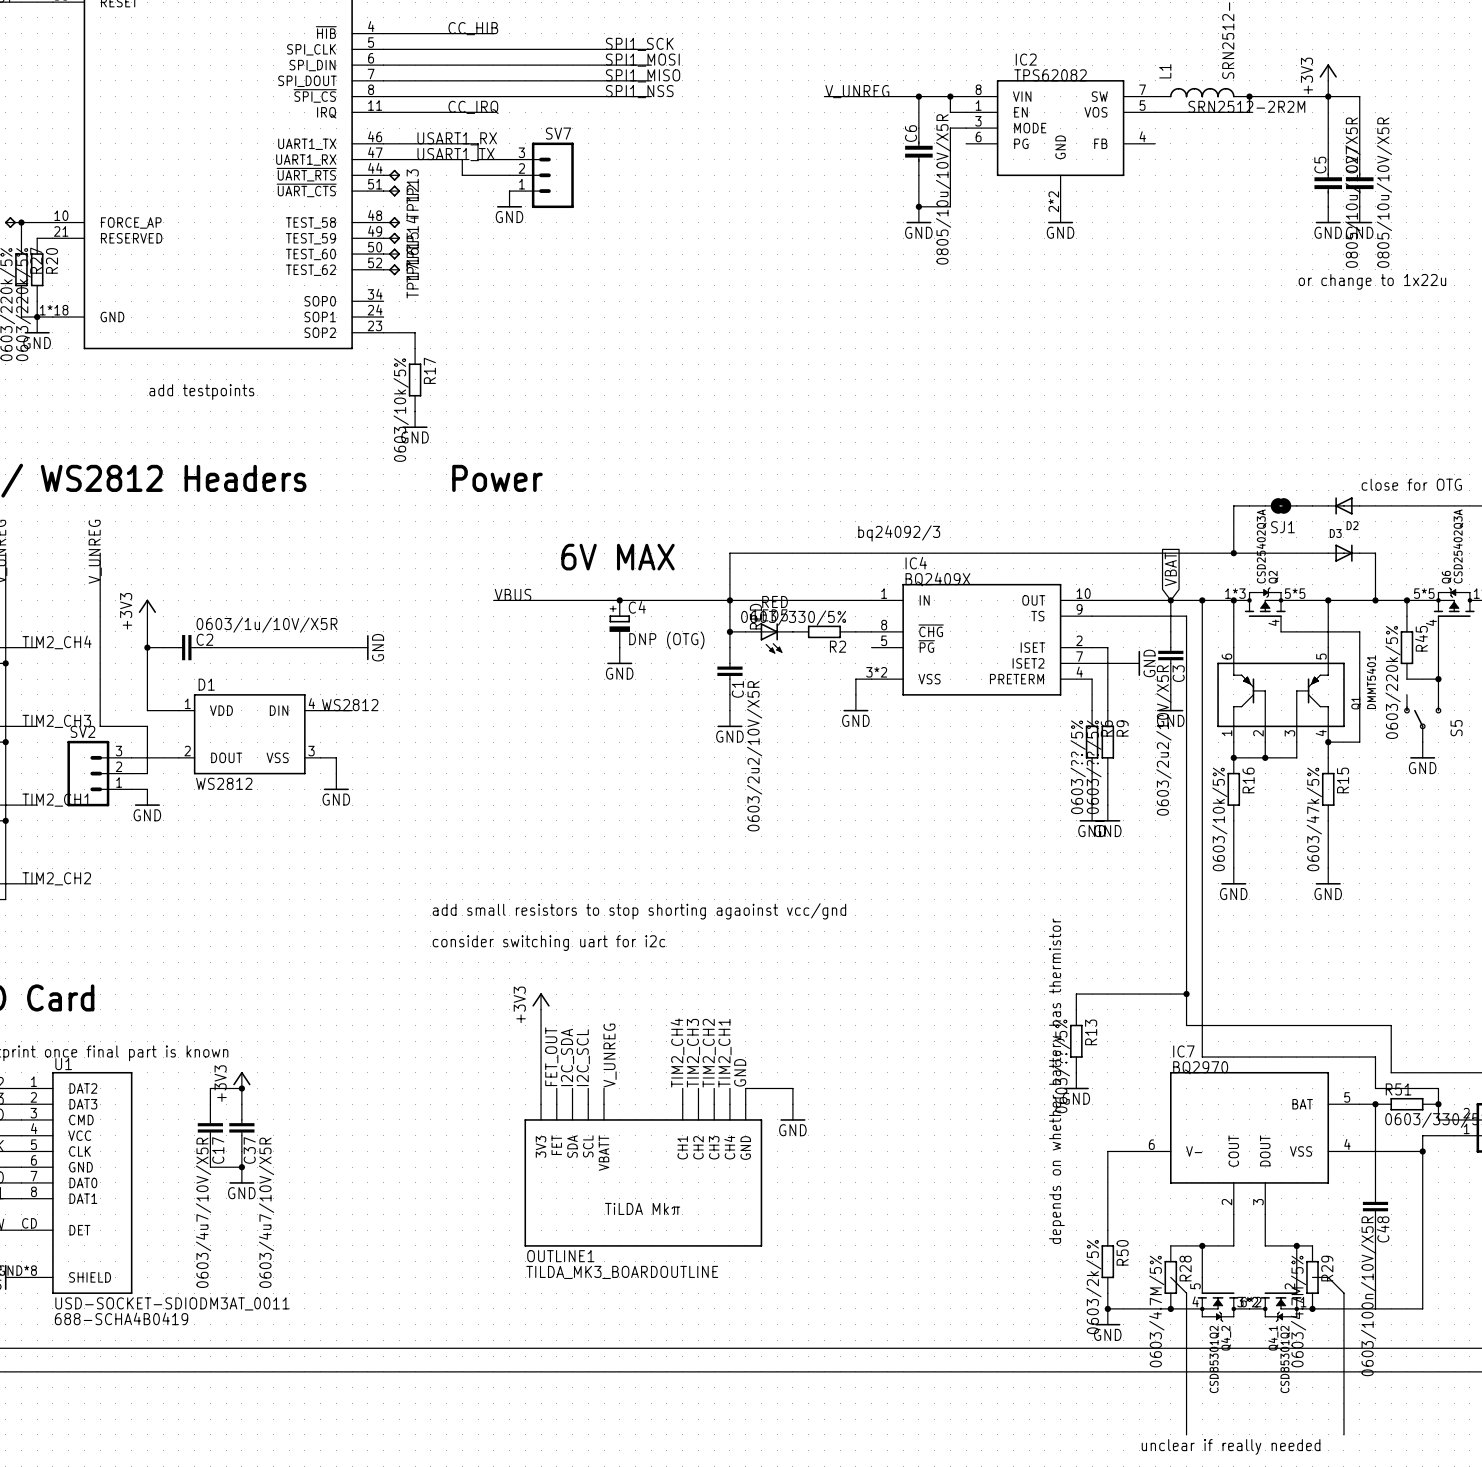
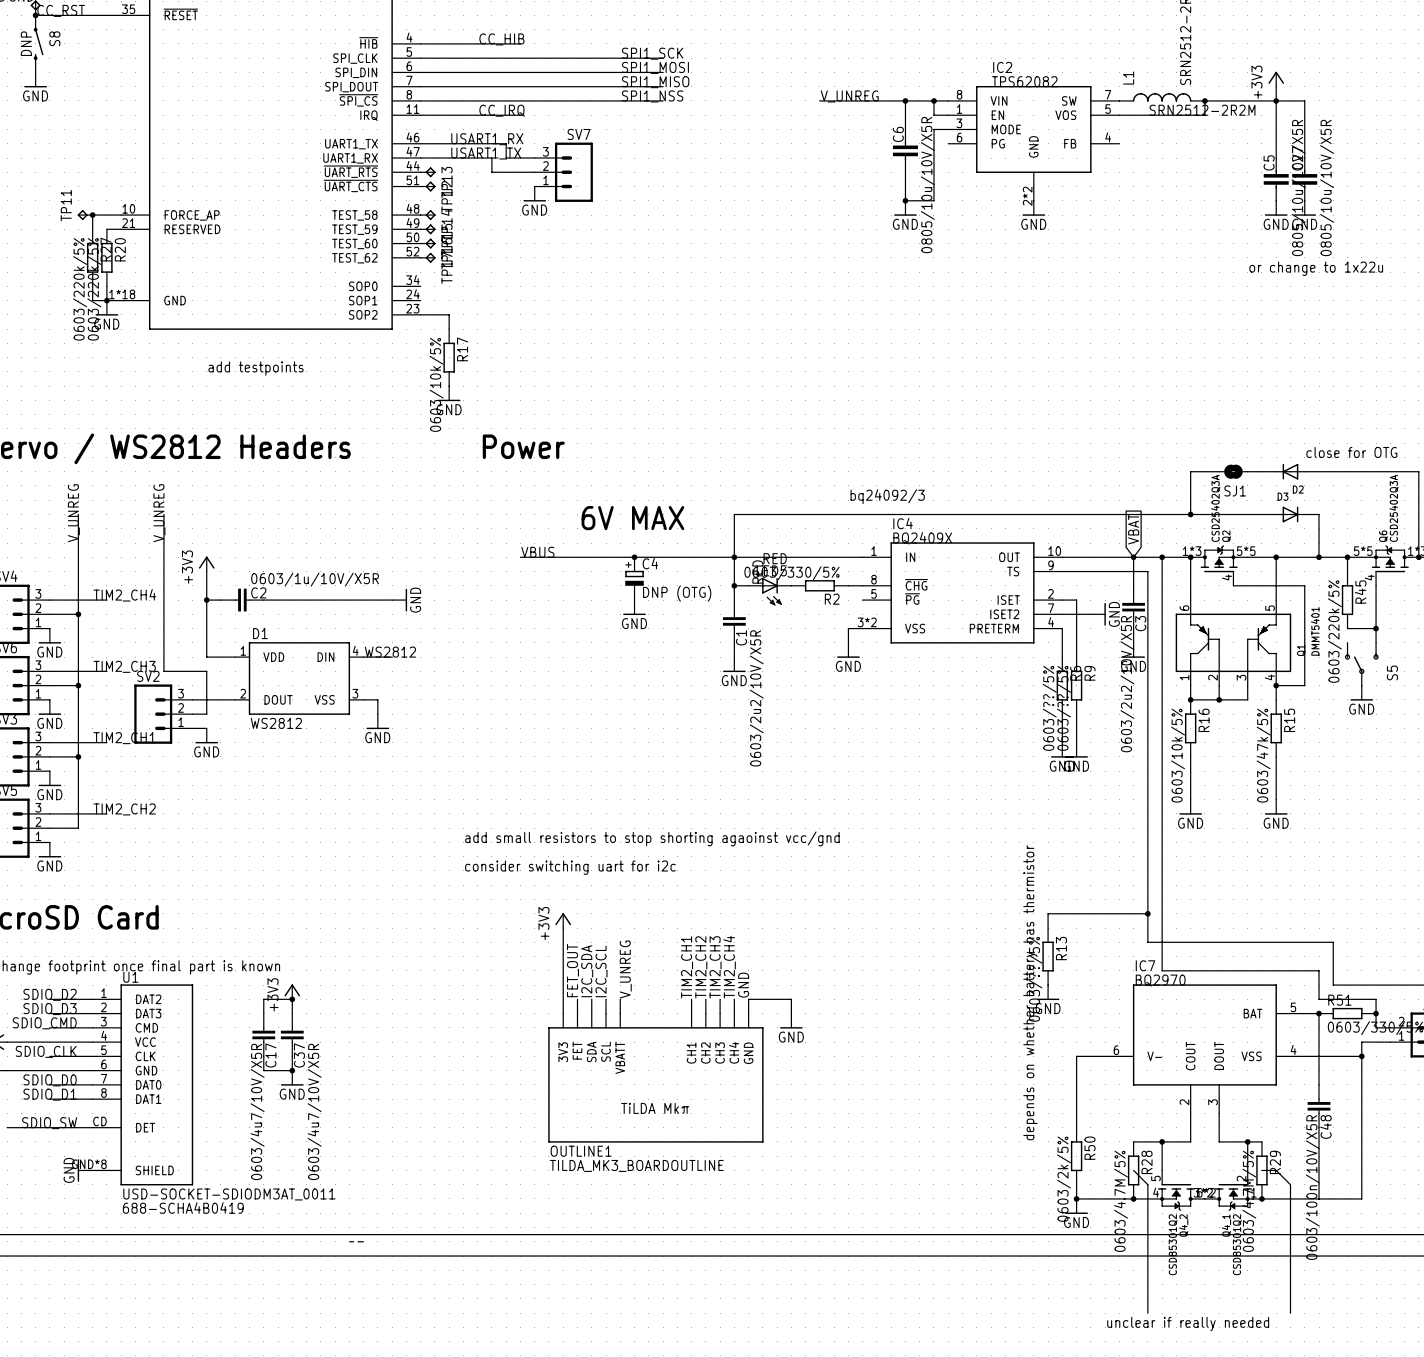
label: TIM2_CH4 (677, 1052) -> TIM2_CH1 (687, 967)
label: TIM2_CH3 (693, 1053) -> TIM2_CH2 (701, 967)
label: TIM2_CH2 (709, 1053) -> TIM2_CH3 (715, 967)
label: TIM2_CH1 (724, 1053) -> TIM2_CH4 (729, 967)
wire: none -> (349, 1241) (363, 1241)

